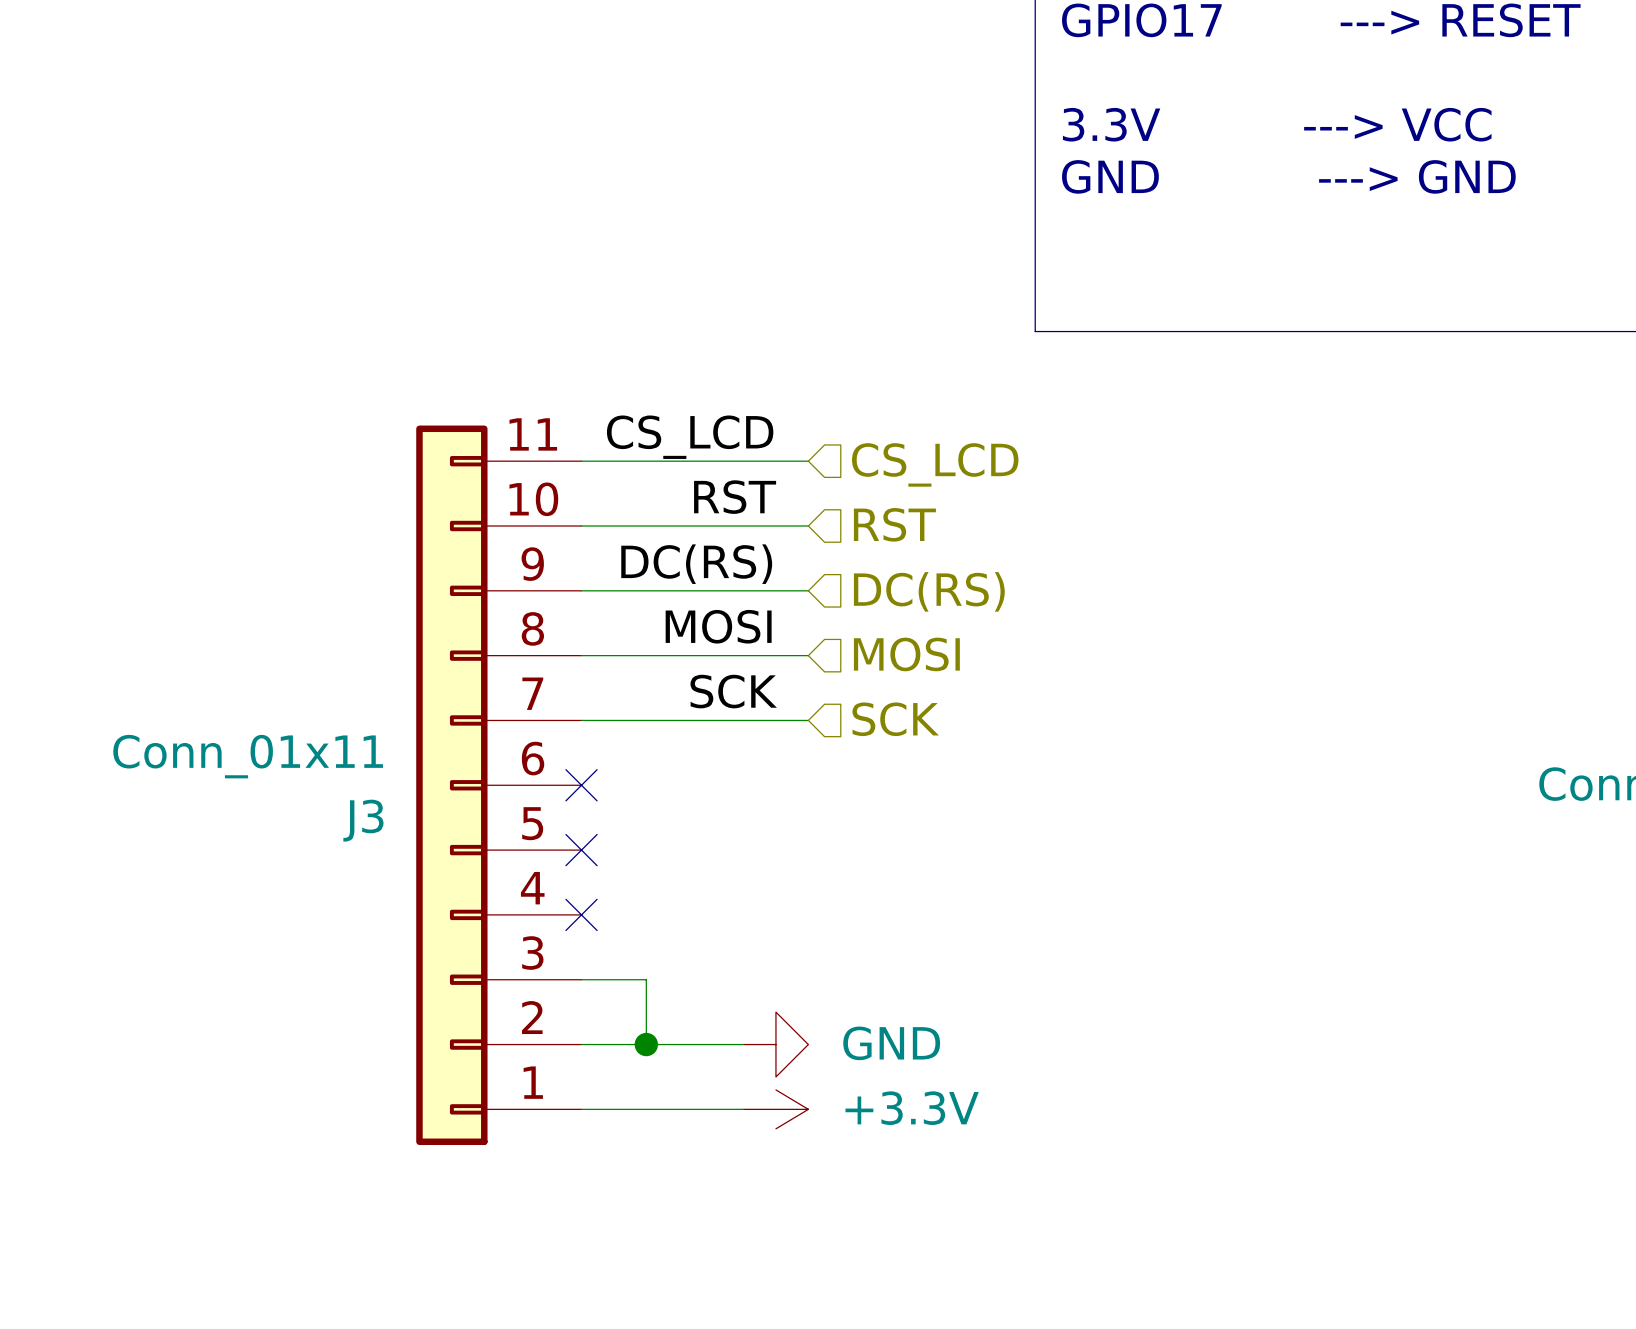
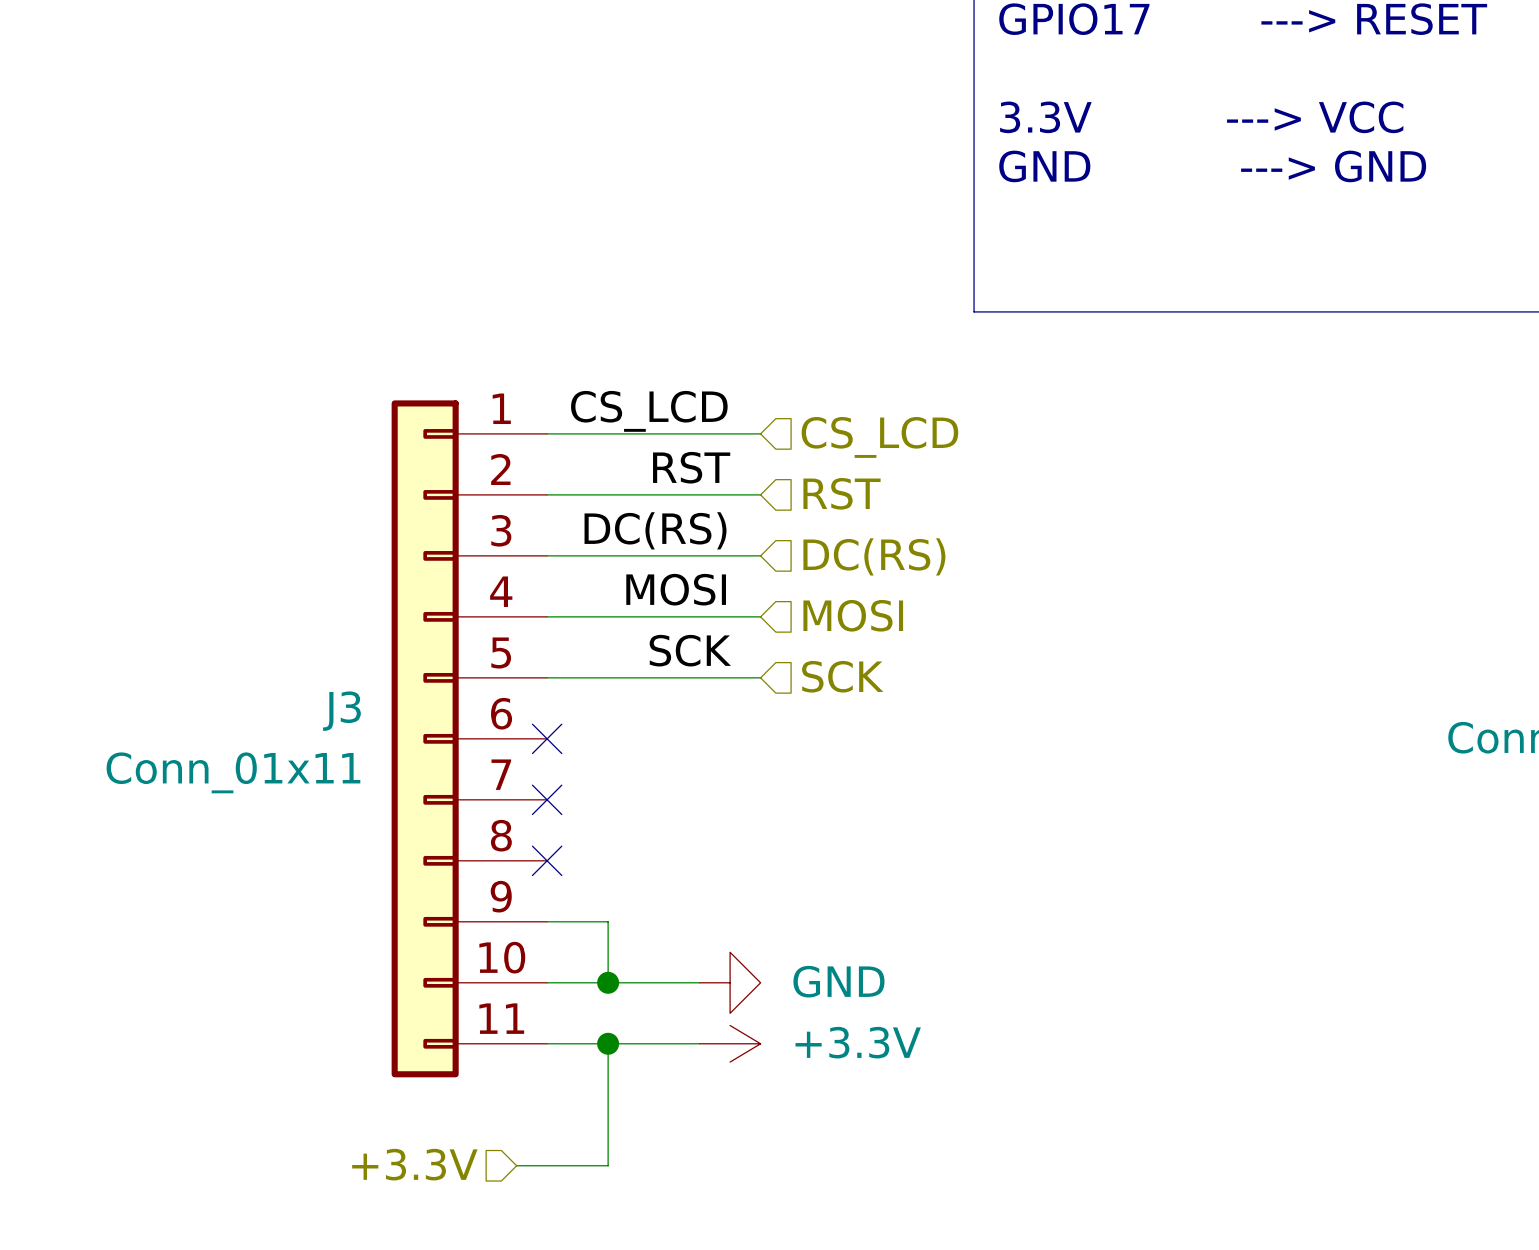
J3 flip: as is (451, 785) -> up-down (425, 738)
wire: none -> (608, 1043) (608, 1165) (516, 1165)
junction: none -> (608, 1043)
hierarchical label: none -> +3.3V (414, 1164)

